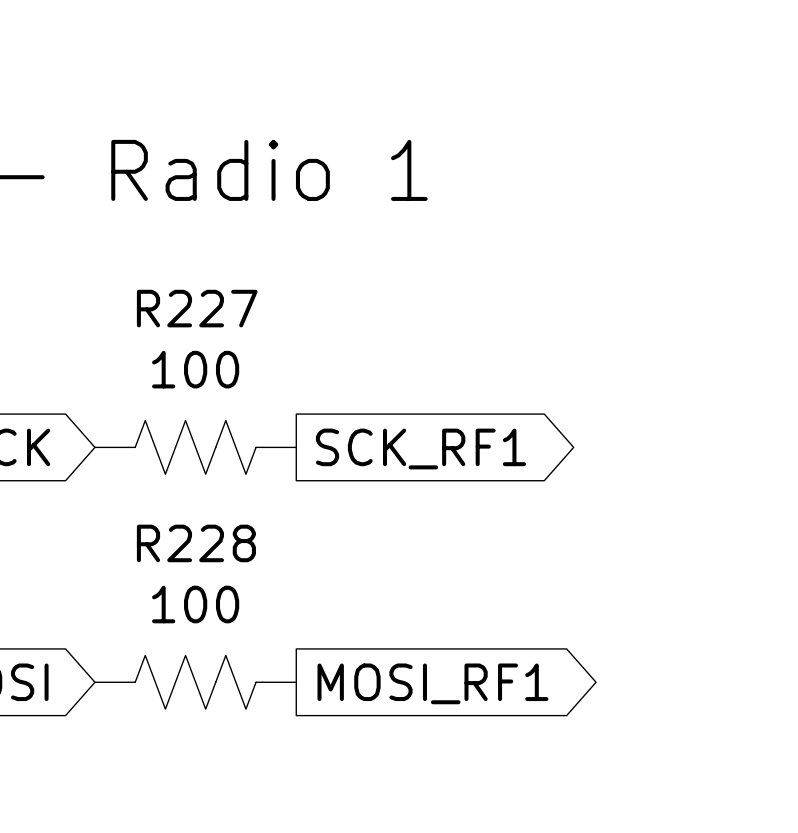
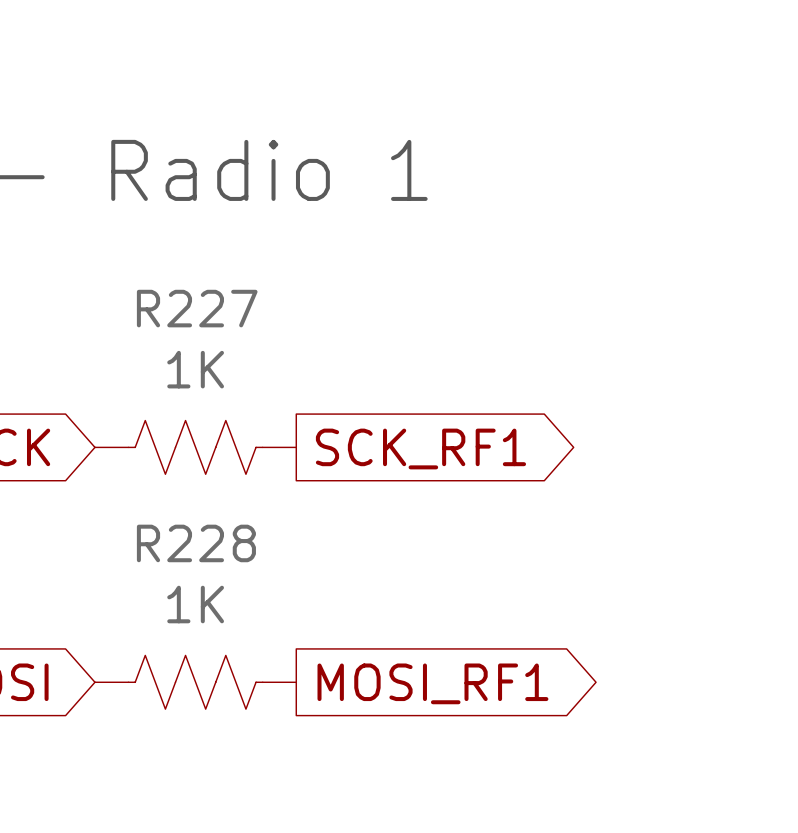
R227 value: 100 (195, 369) -> 1K (195, 369)
R228 value: 100 (195, 604) -> 1K (195, 604)

